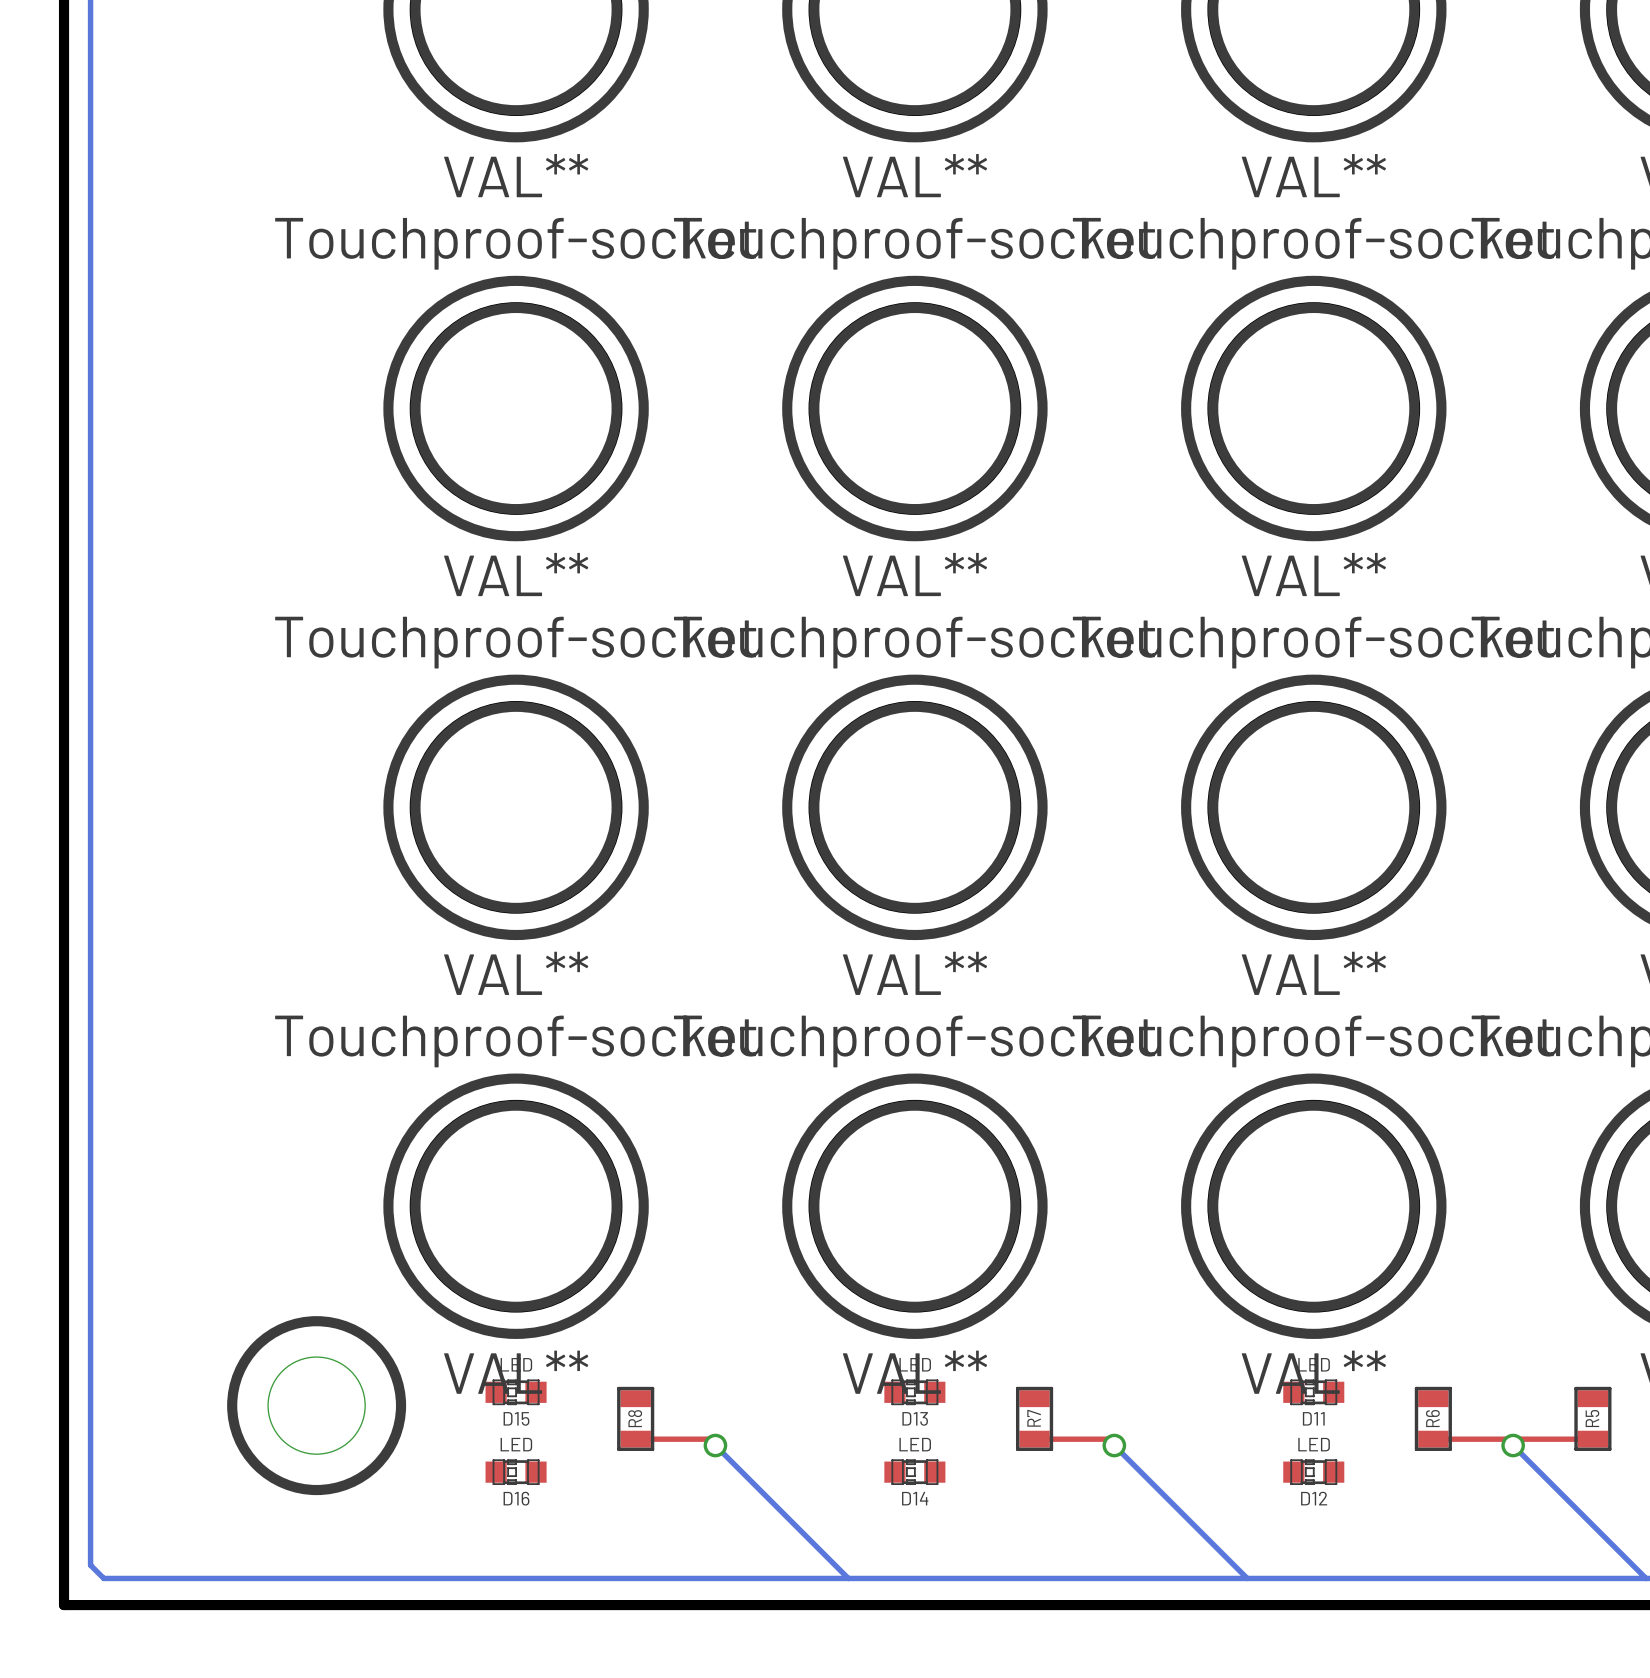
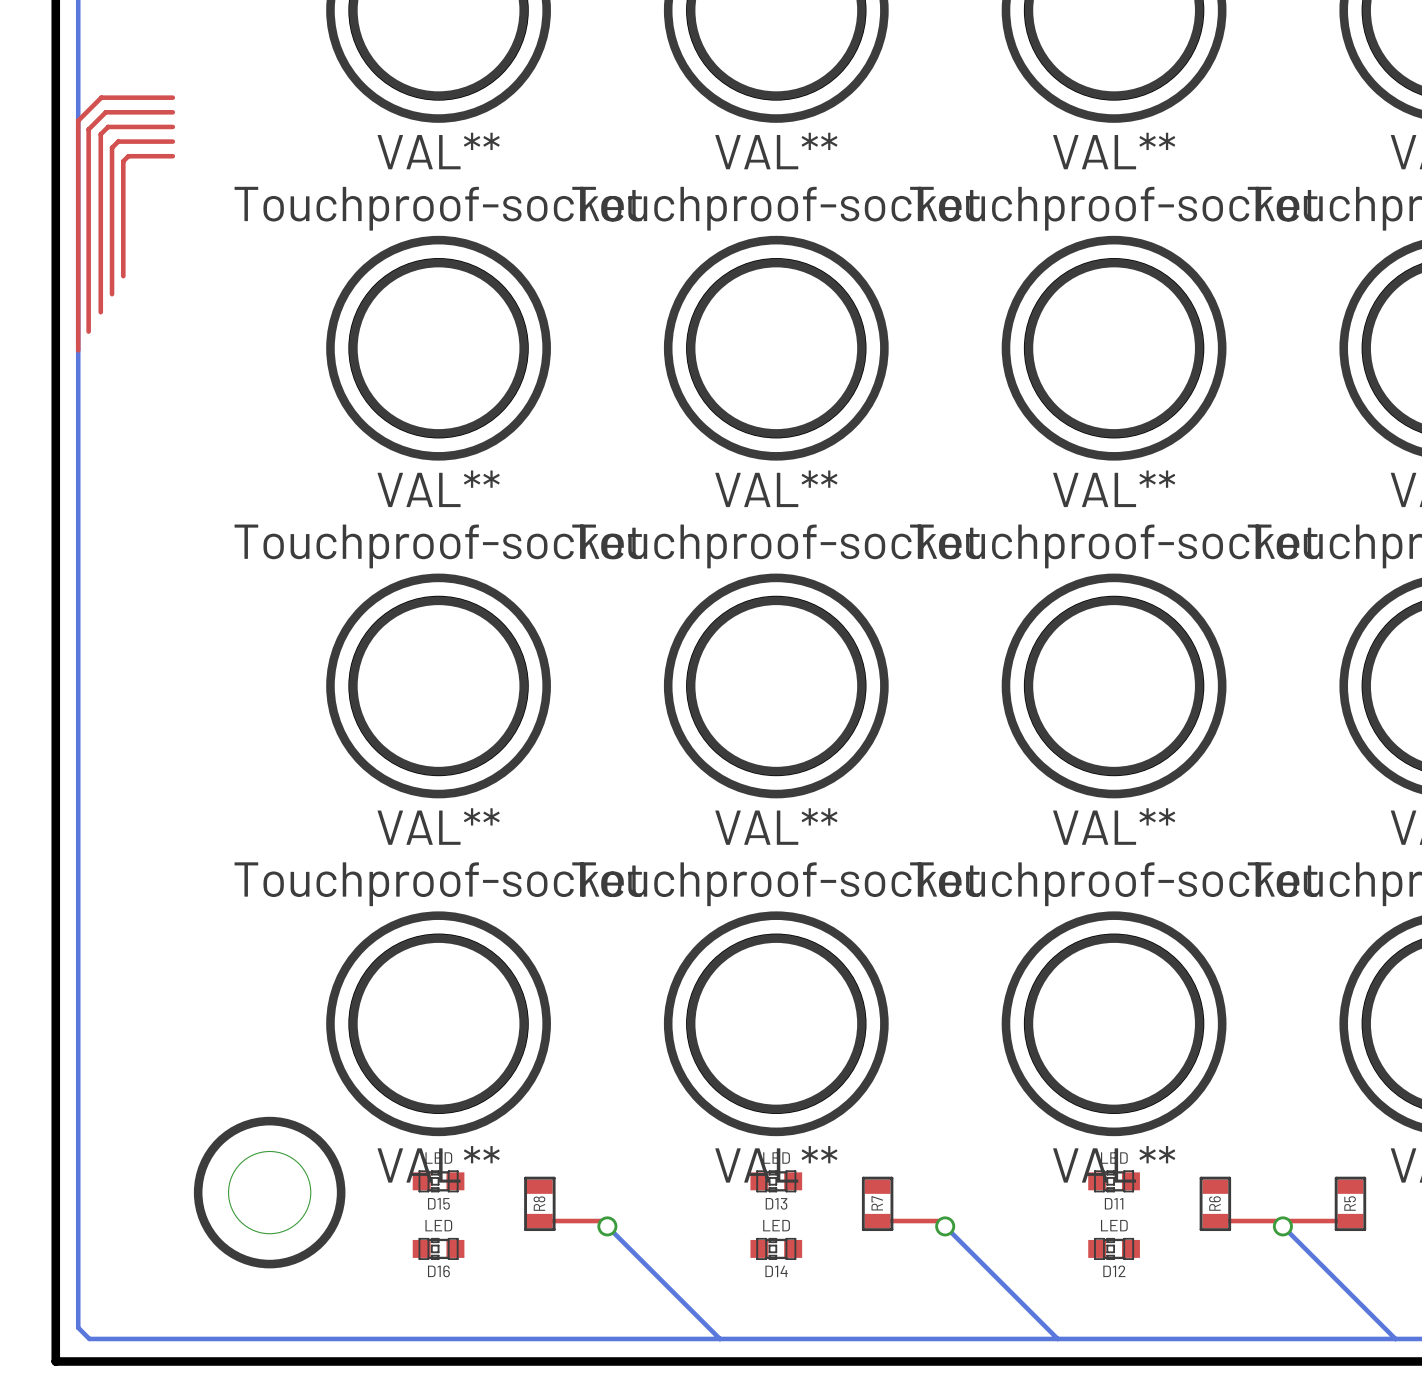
top track: none -> (172, 97) (101, 97) (78, 120) (78, 350)
top track: none -> (172, 112) (105, 112) (88, 129) (88, 331)
top track: none -> (172, 126) (108, 126) (100, 134) (100, 312)
top track: none -> (172, 141) (118, 141) (112, 147) (112, 294)
top track: none -> (172, 156) (128, 156) (123, 161) (123, 276)

